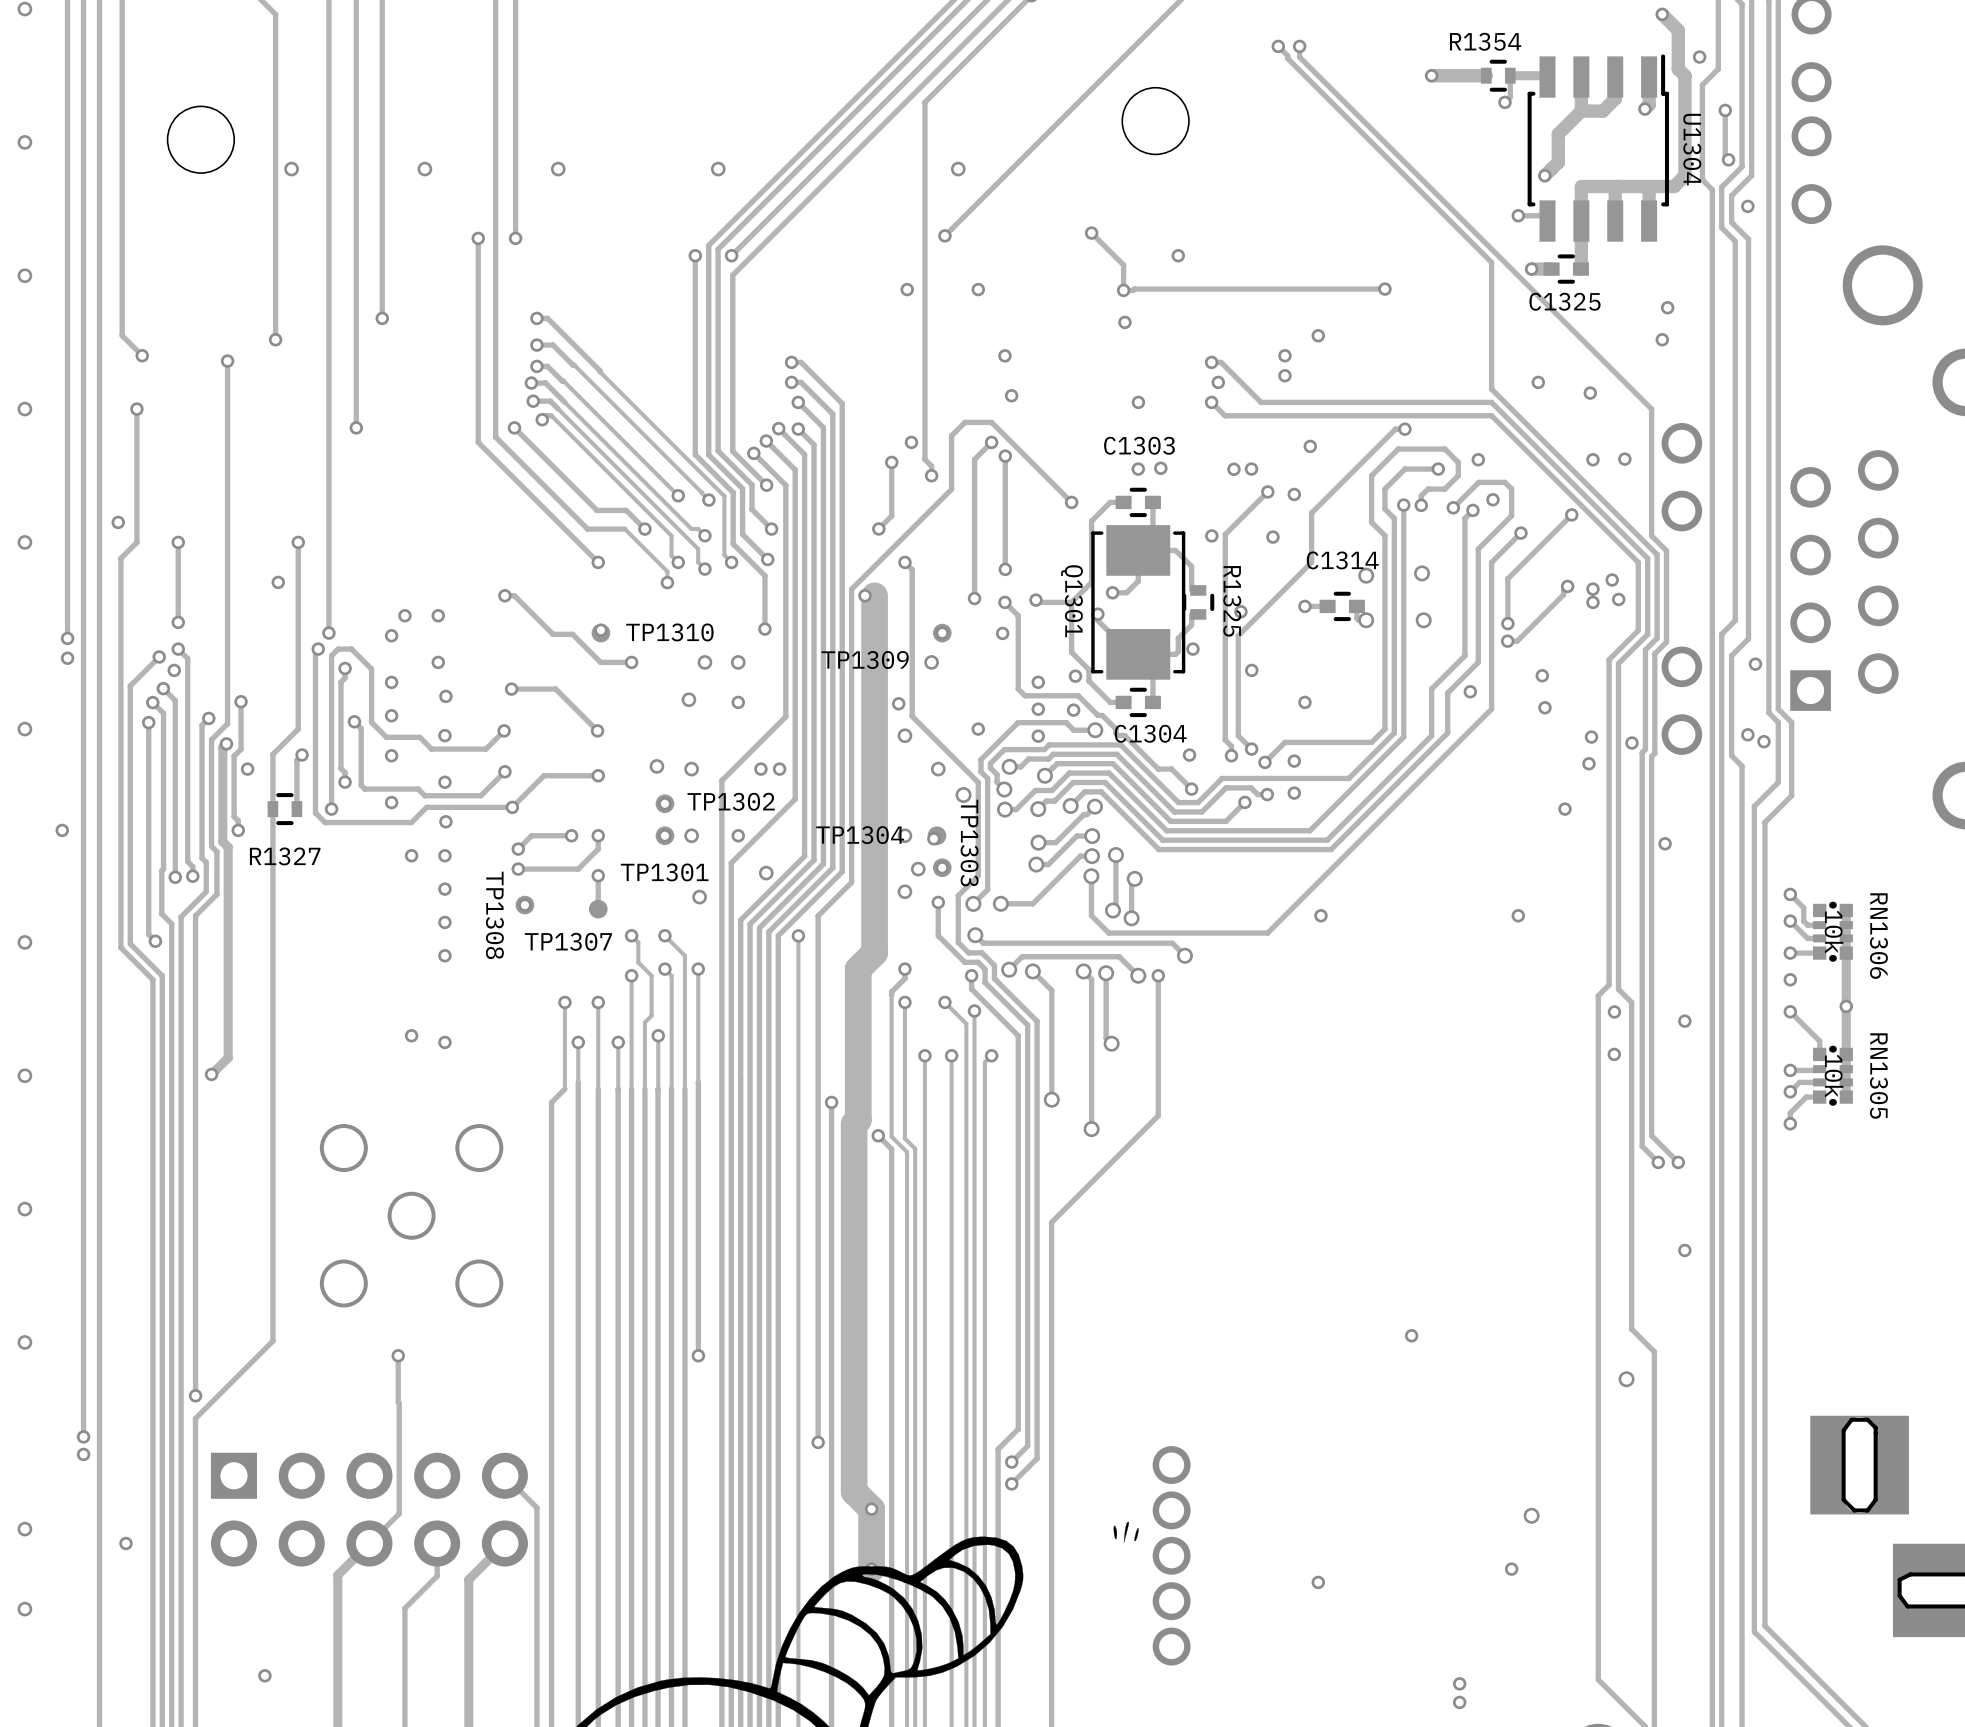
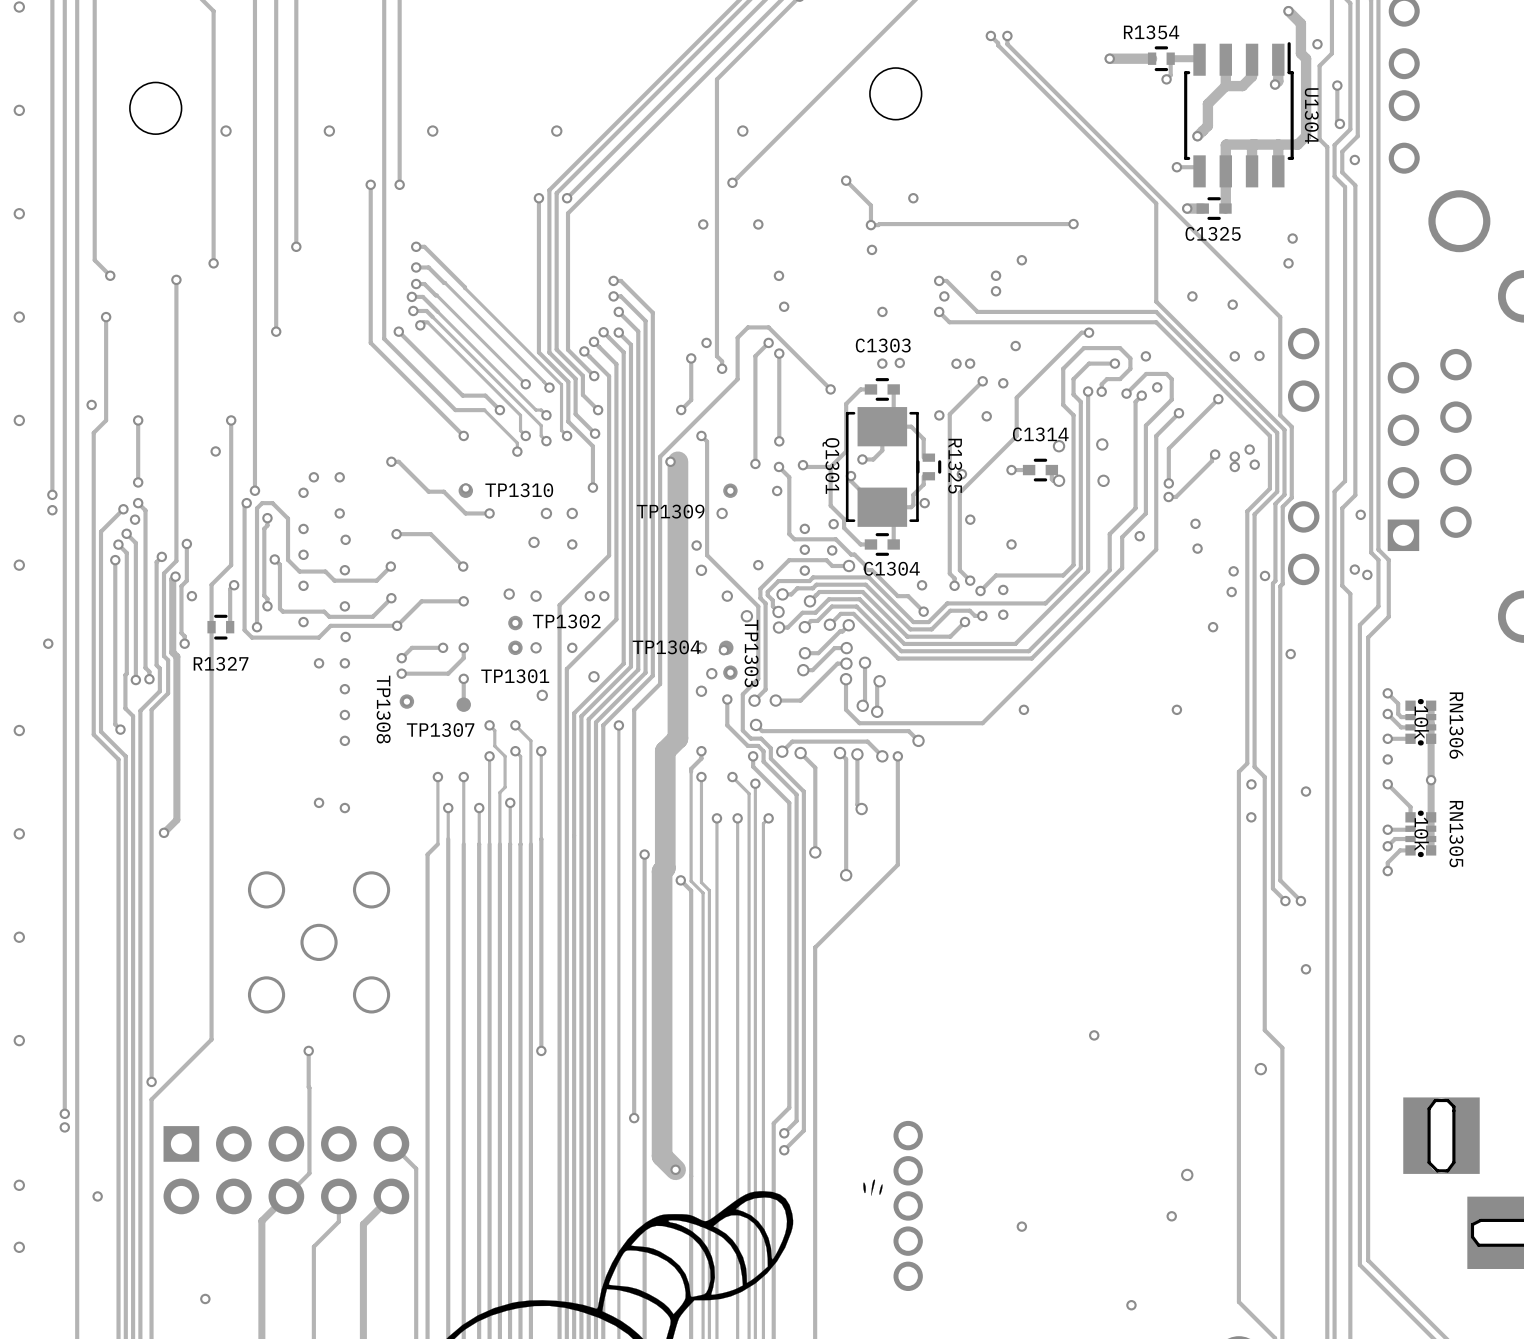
track: (871, 1509) (871, 1569) -> none
via: (1459, 1702) -> none

